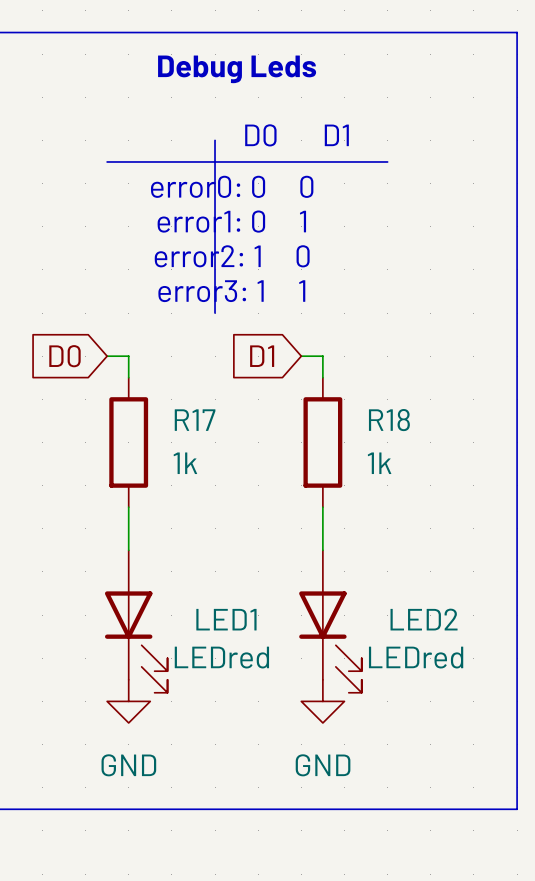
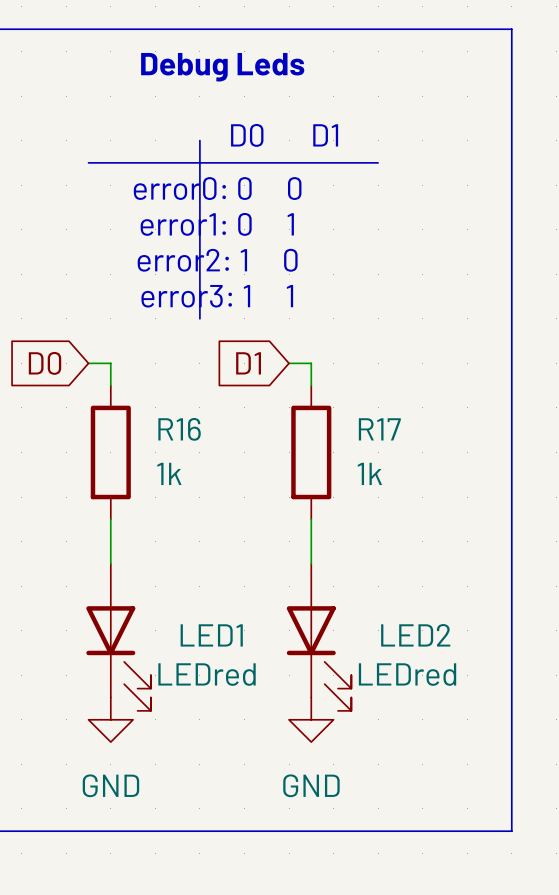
R17 name: R17 (195, 420) -> R16 (179, 429)
R18 name: R18 (389, 420) -> R17 (379, 429)

